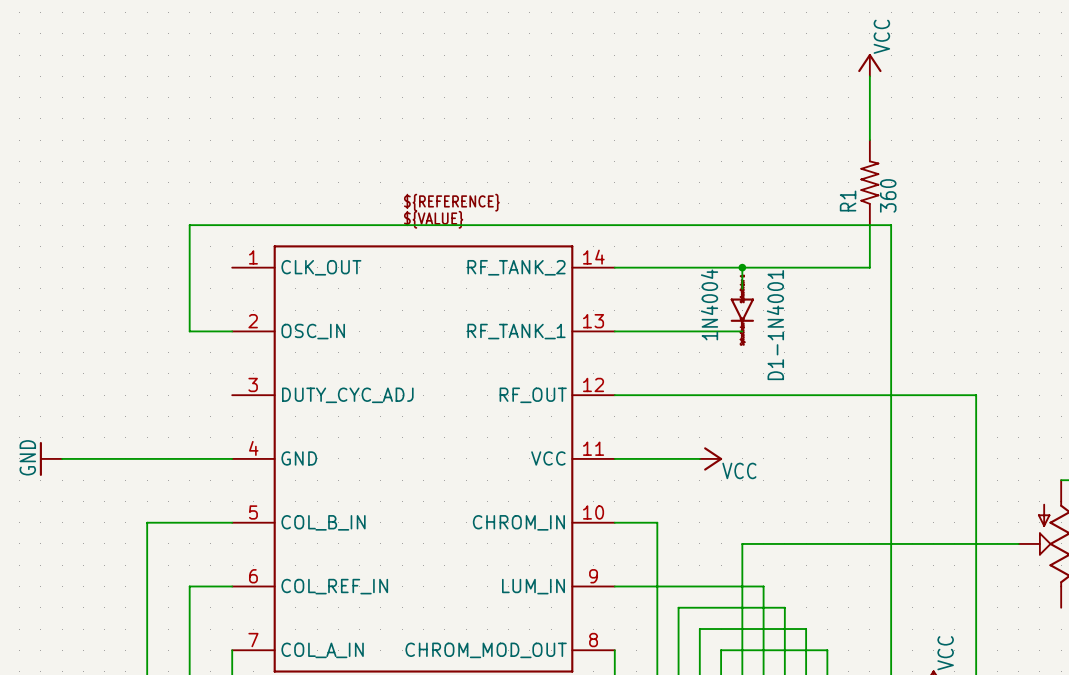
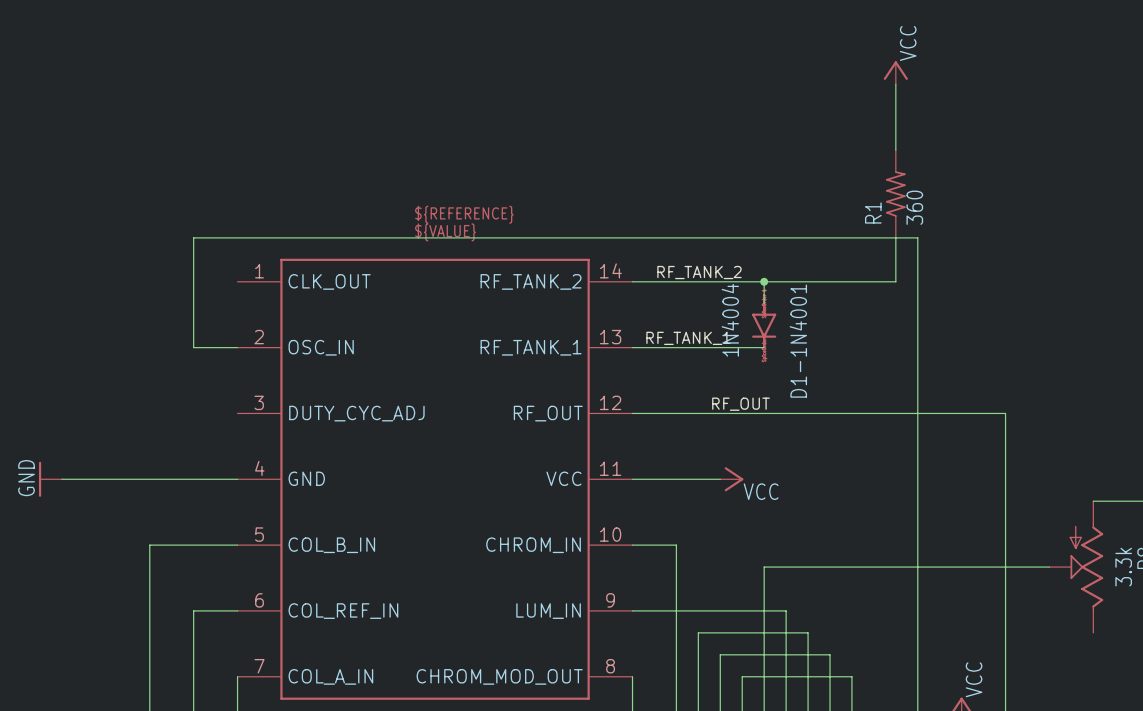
label: none -> RF_TANK_2 (699, 272)
label: none -> RF_TANK_1 (688, 338)
label: none -> RF_OUT (741, 404)

